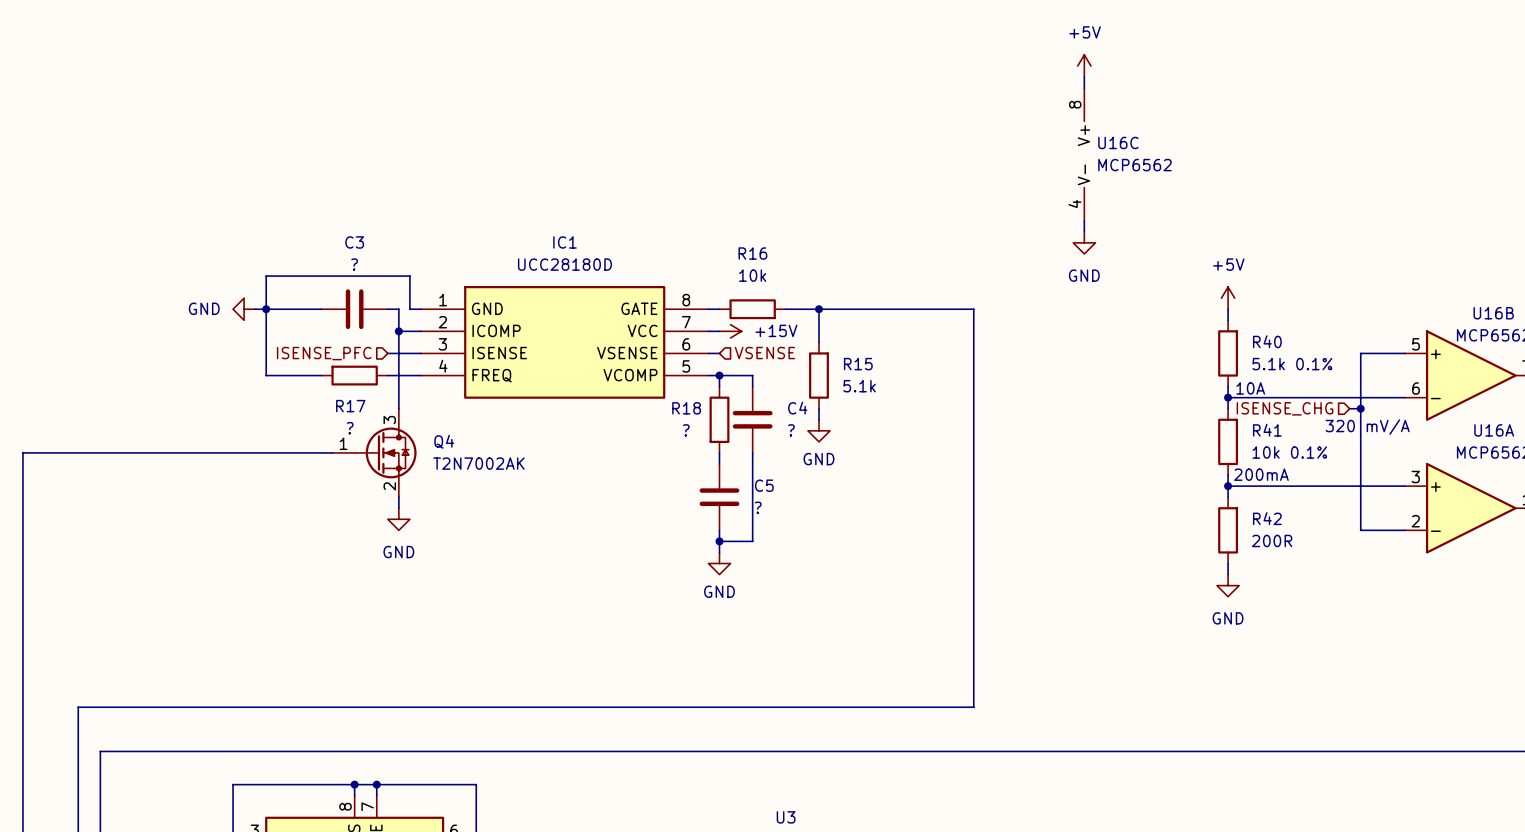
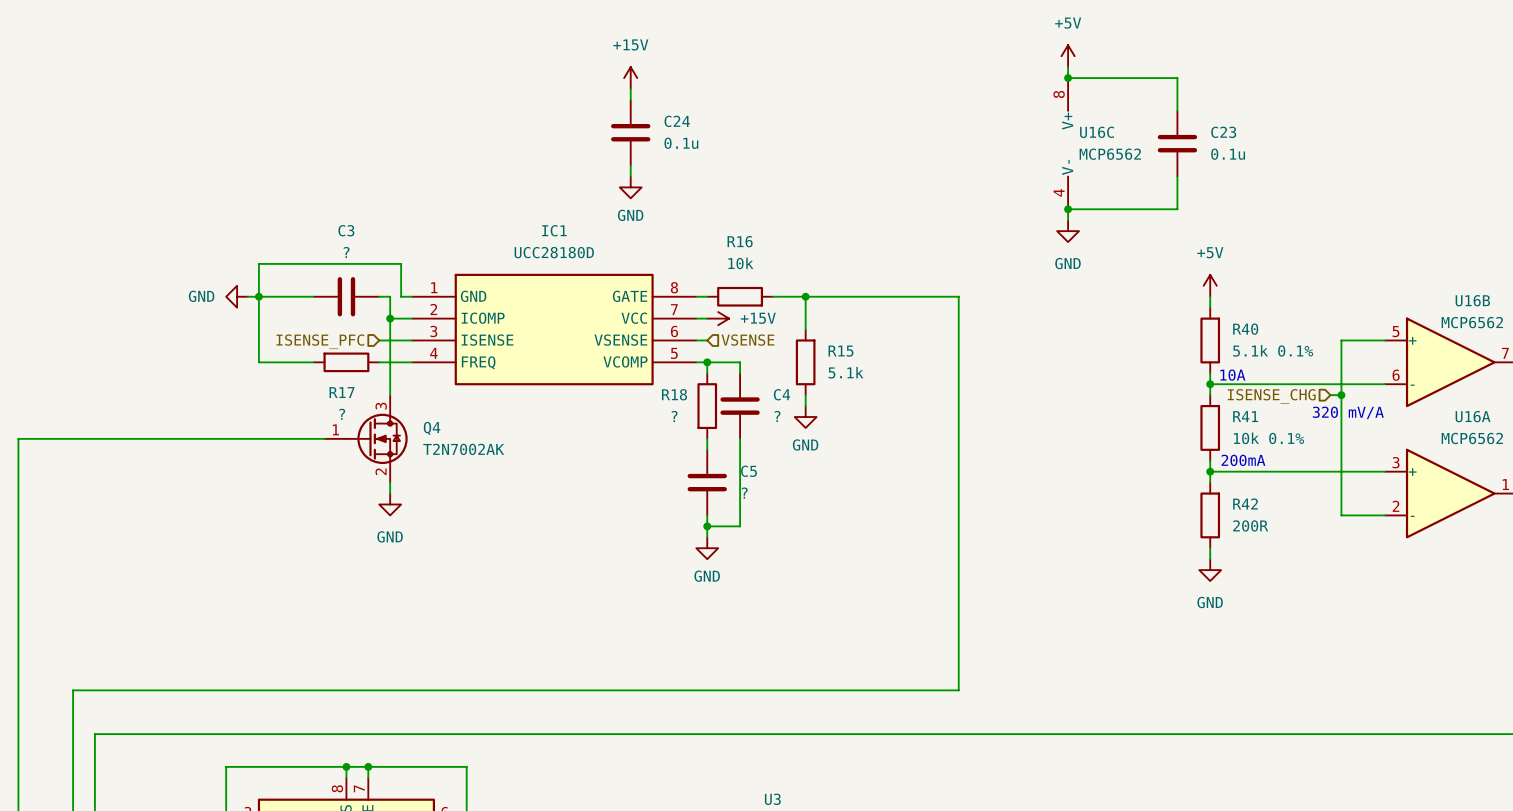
power symbol: none -> +15V (630, 78)
wire: none -> (1068, 78) (1177, 78) (1177, 110)
junction: none -> (1068, 78)
wire: none -> (630, 89) (630, 99)
C24: none -> 0.1u (630, 132)
C23: none -> 0.1u (1177, 143)
wire: none -> (630, 165) (630, 176)
wire: none -> (1177, 176) (1177, 209) (1068, 209)
power symbol: none -> GND (630, 187)
junction: none -> (1068, 209)

